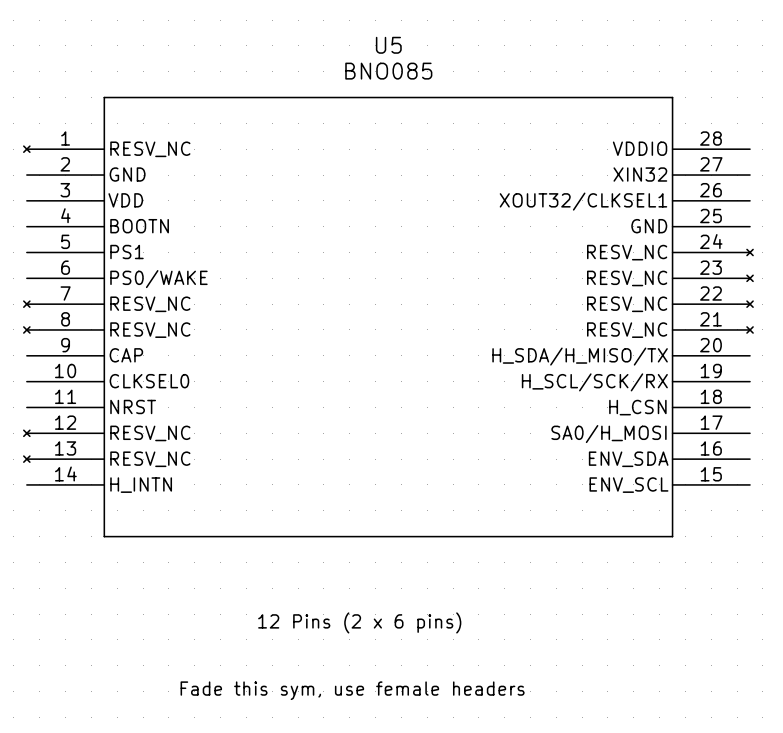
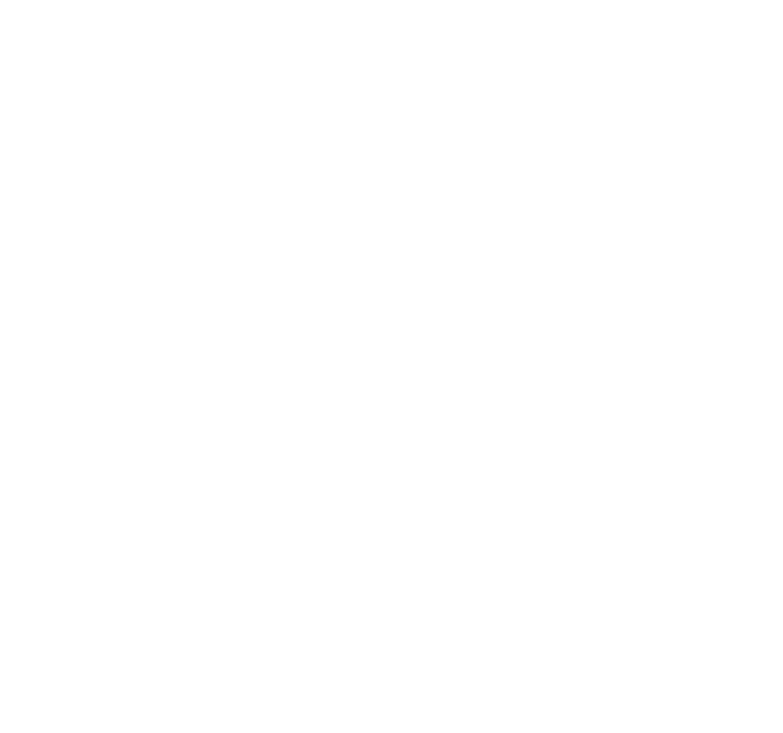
U5: BNO085 (388, 317) -> none
text: 12 Pins (2 x 6 pins) (359, 622) -> none
text: Fade this sym, use female headers (352, 690) -> none

